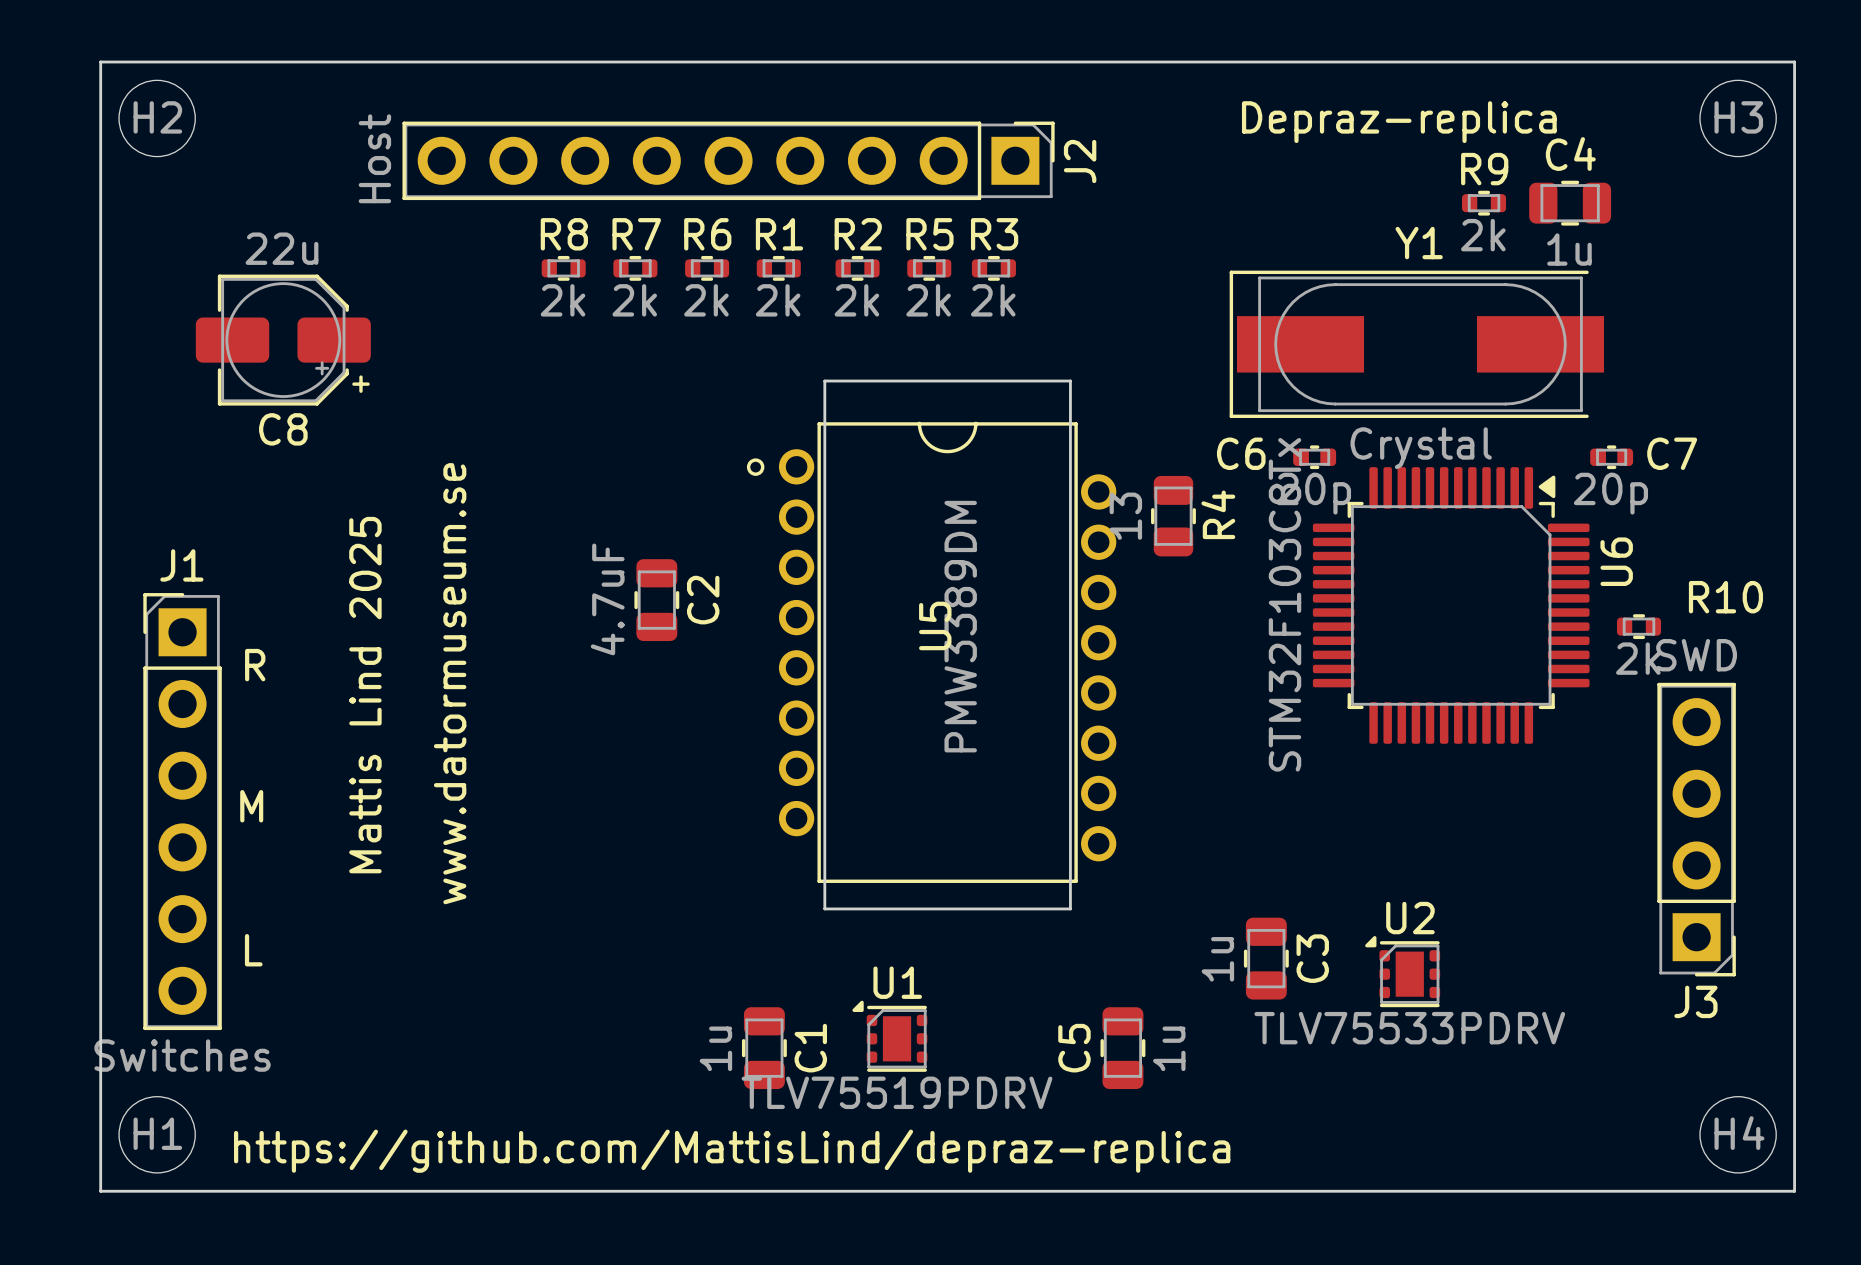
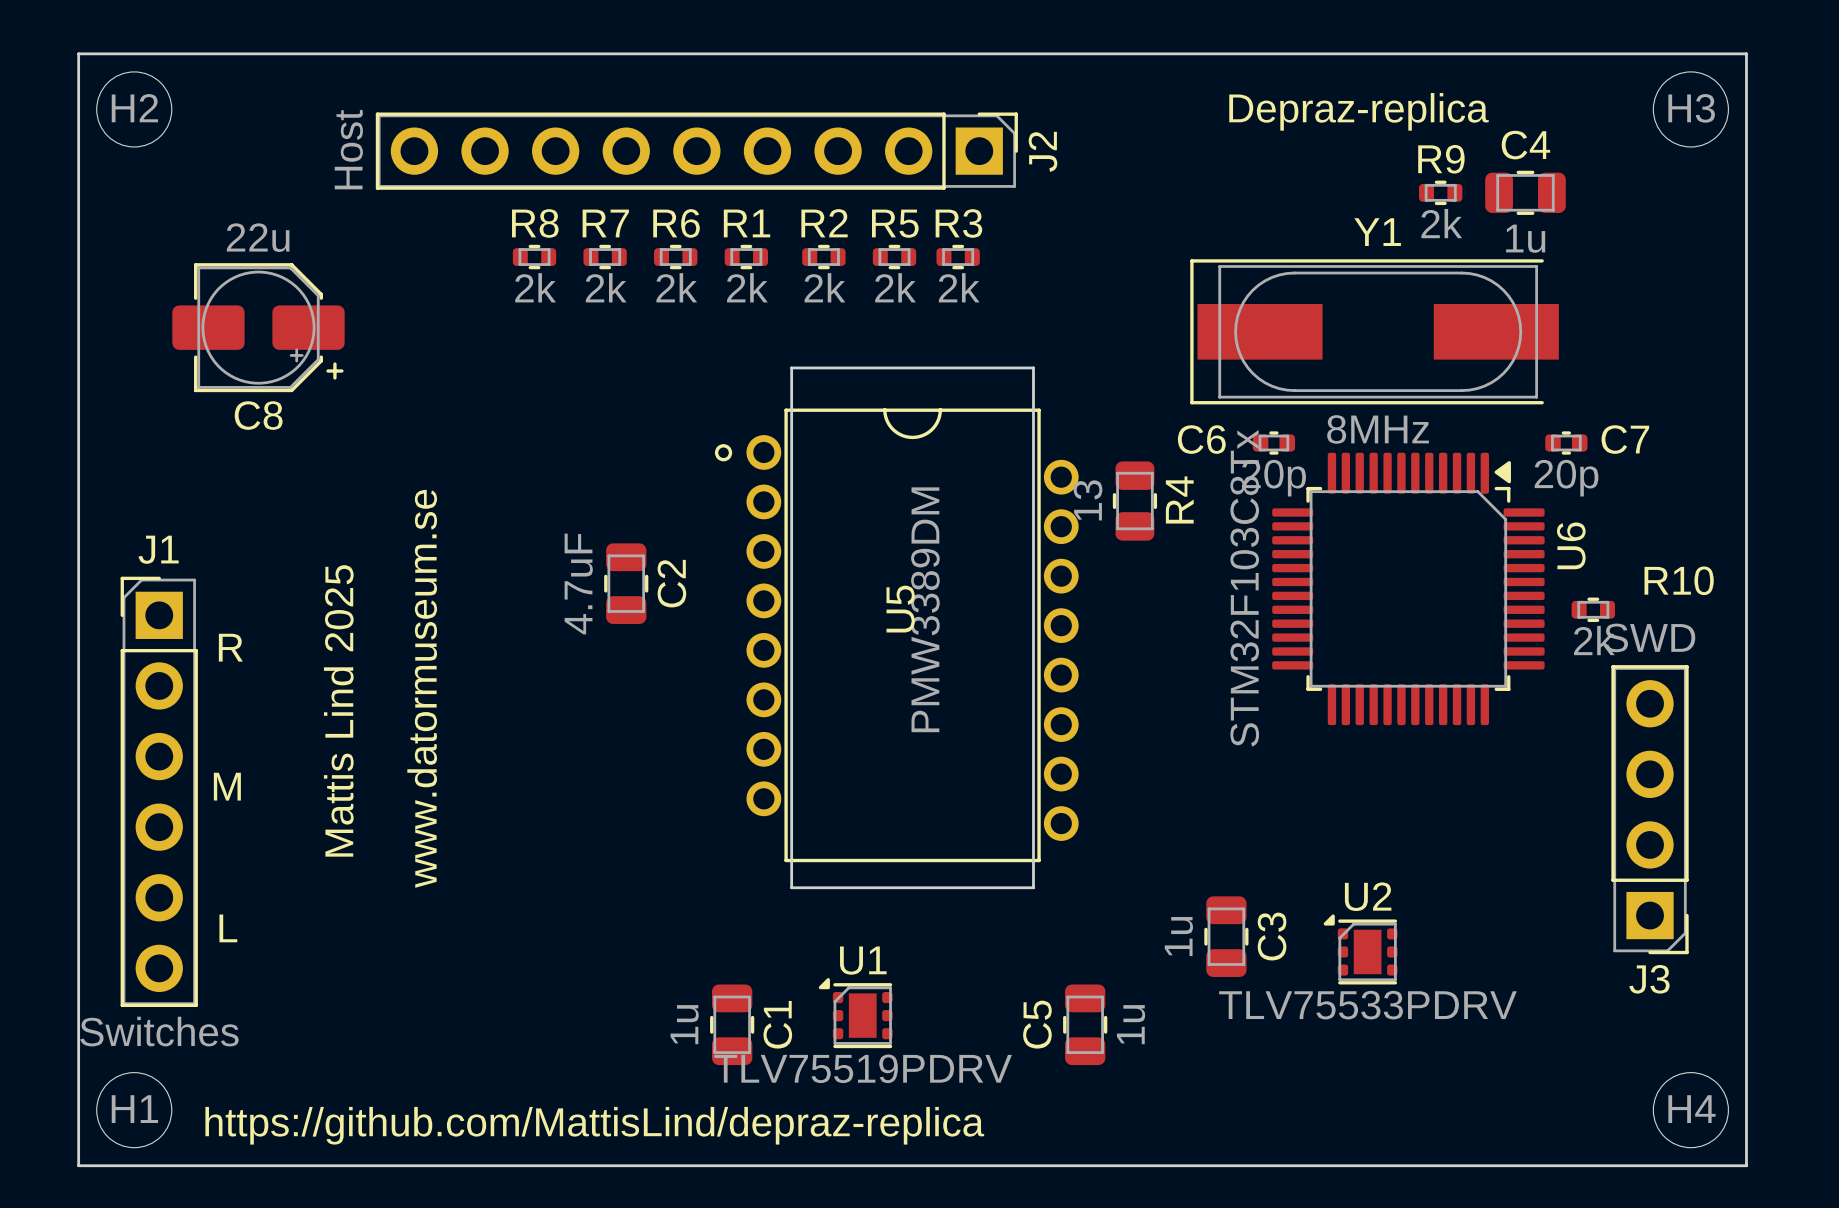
Y1 value: Crystal (1421, 448) -> 8MHz (1378, 429)

